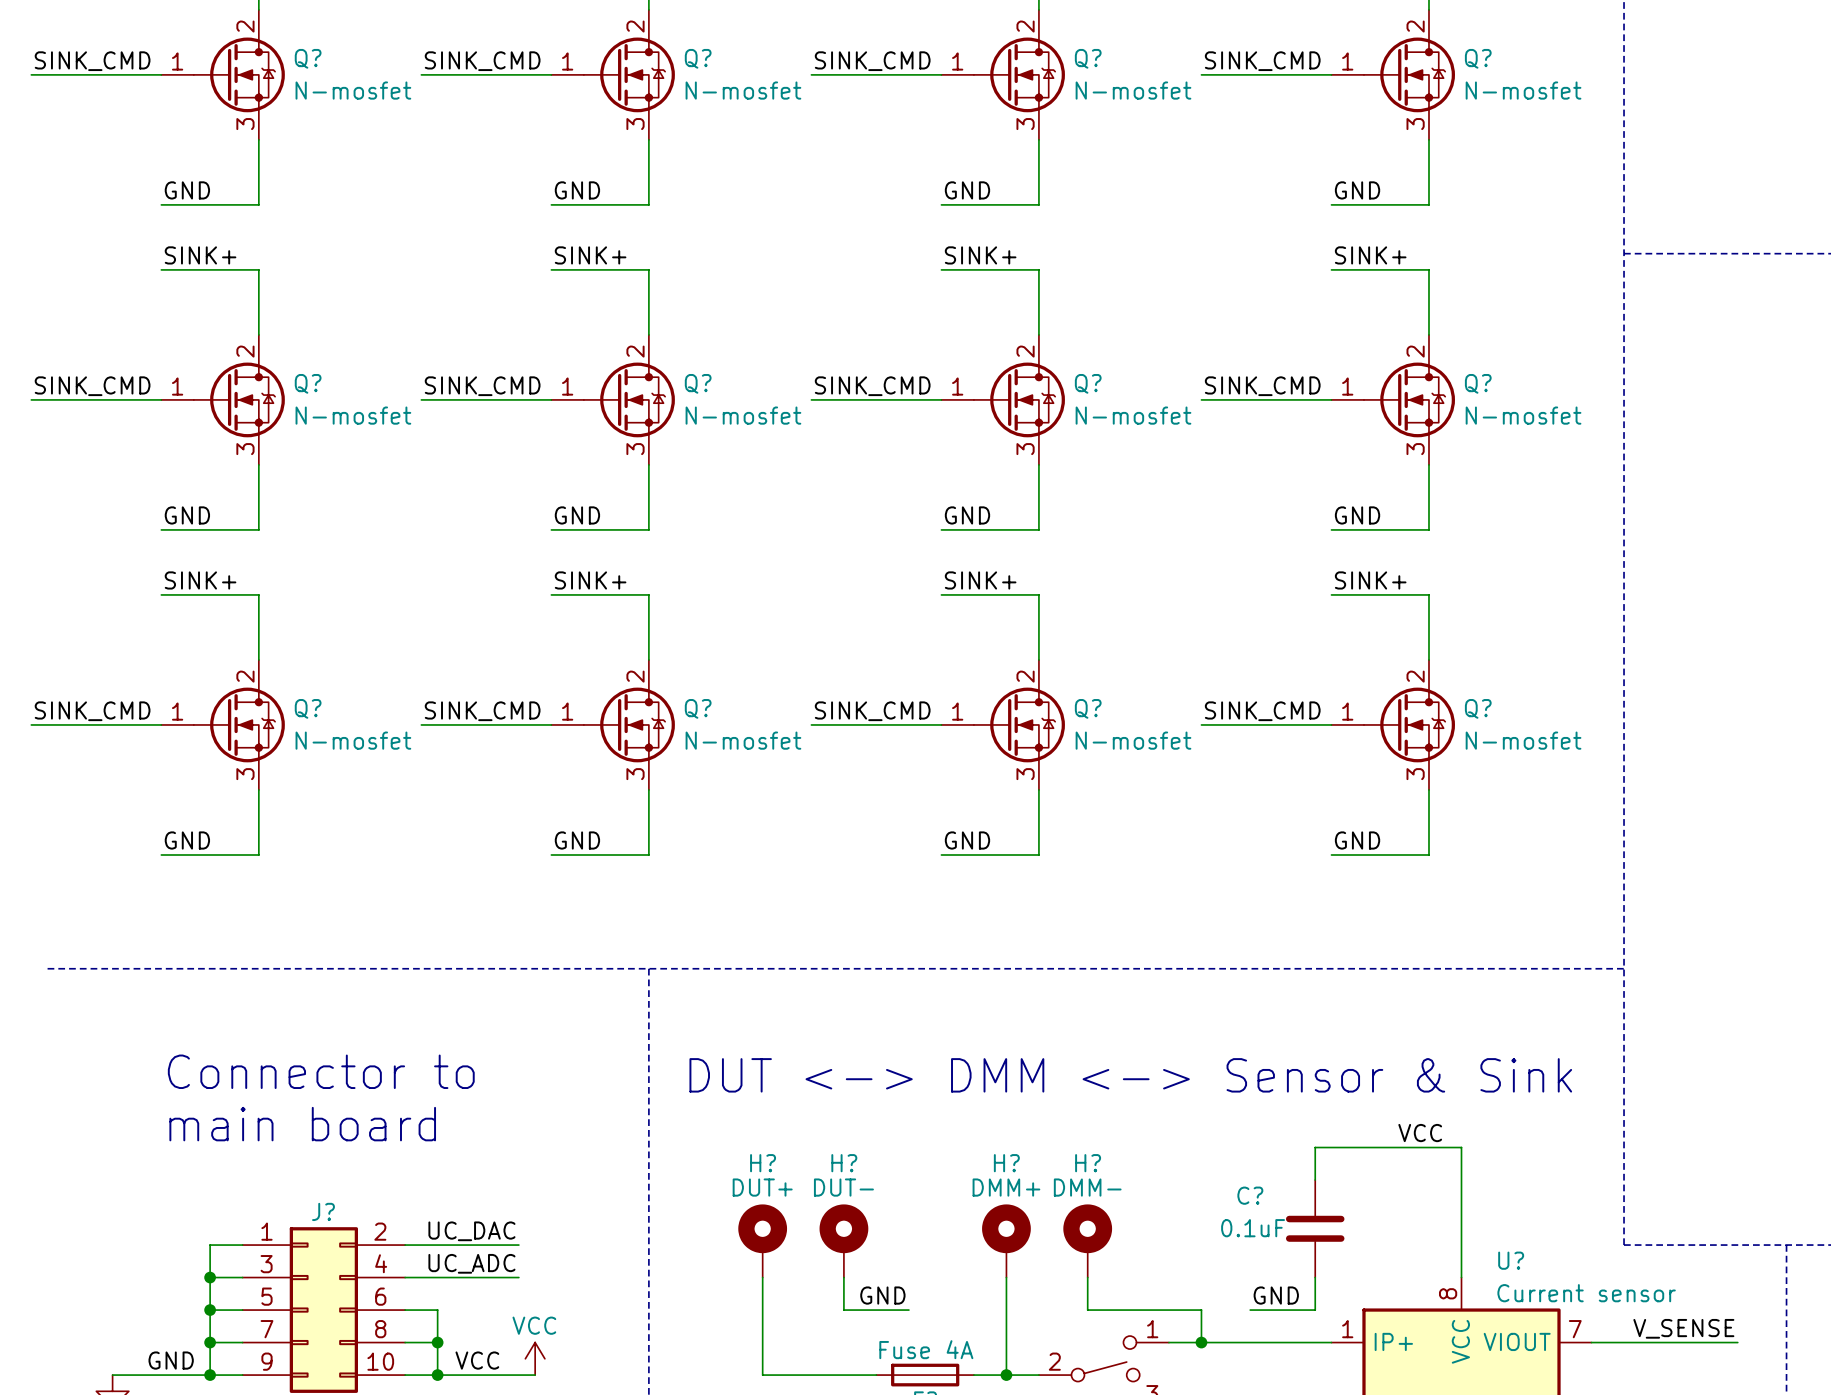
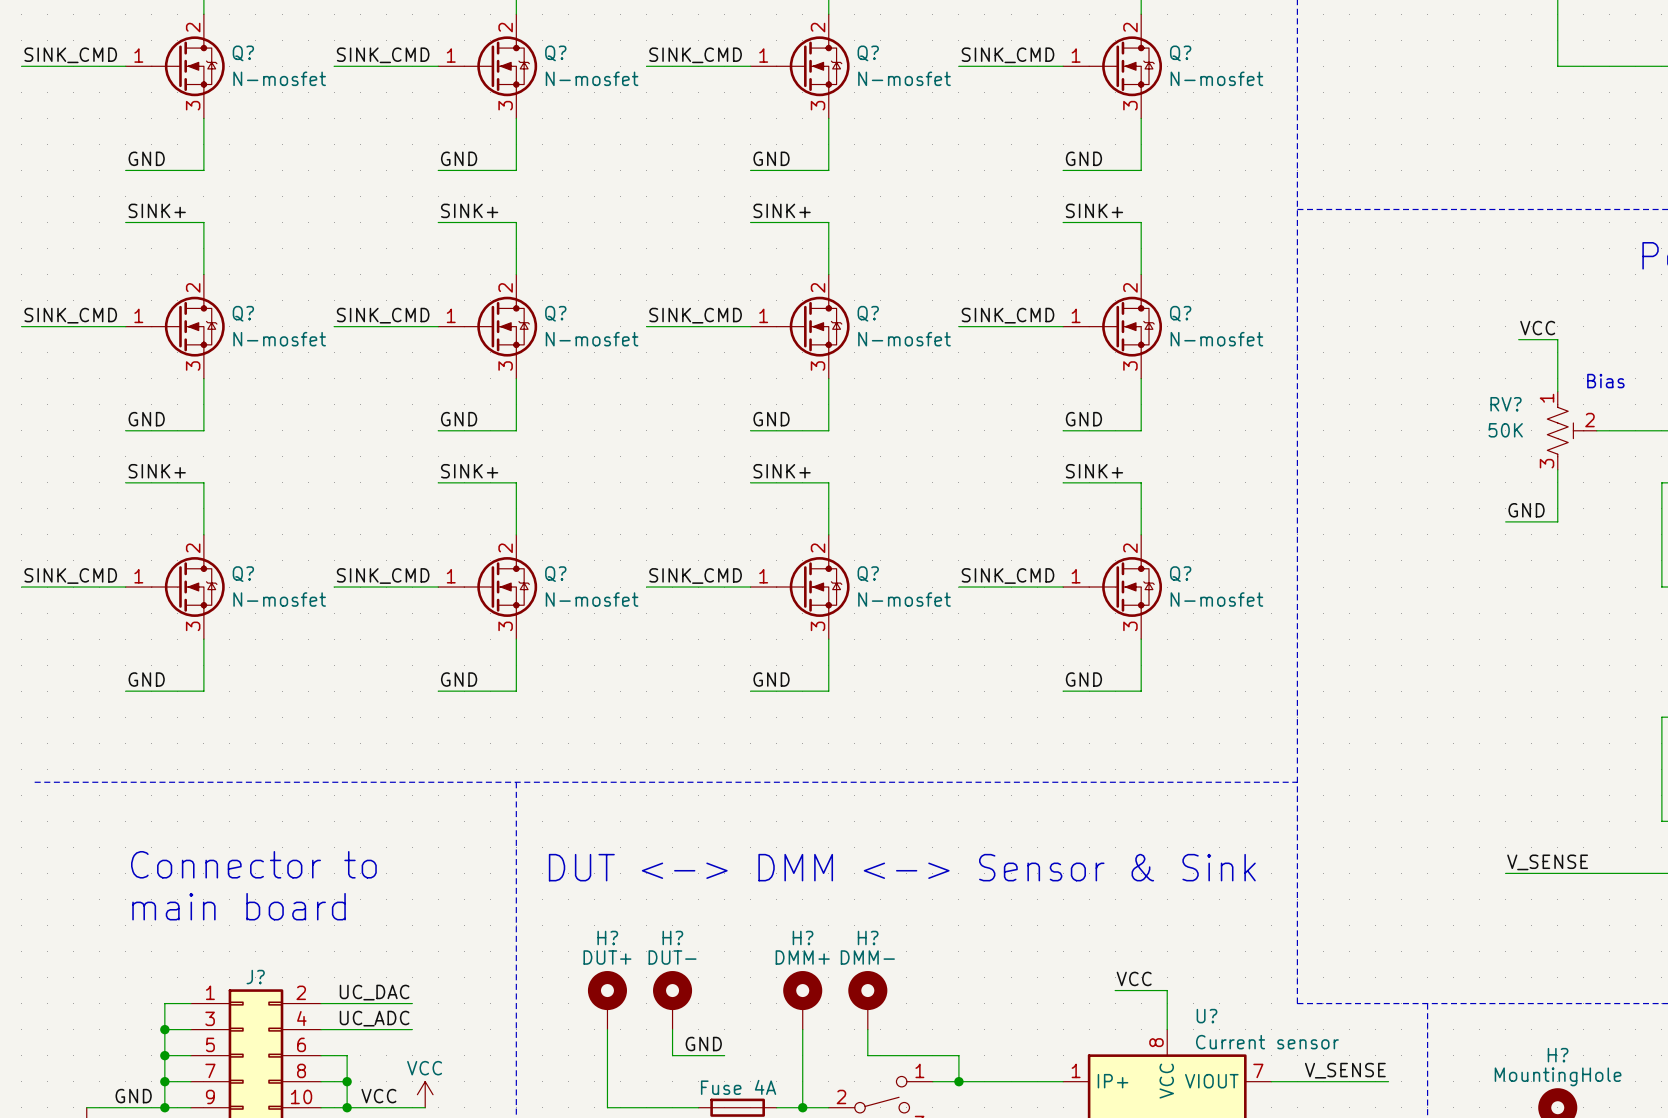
label position: VCC (1420, 1133) -> VCC (1134, 978)
wire: (1315, 1180) (1315, 1147) (1461, 1147) (1461, 1228) -> (1115, 990) (1167, 990)
C?: 0.1uF (1315, 1228) -> none
wire: (1315, 1277) (1315, 1310) (1250, 1310) -> none
label: GND (1276, 1295) -> none

